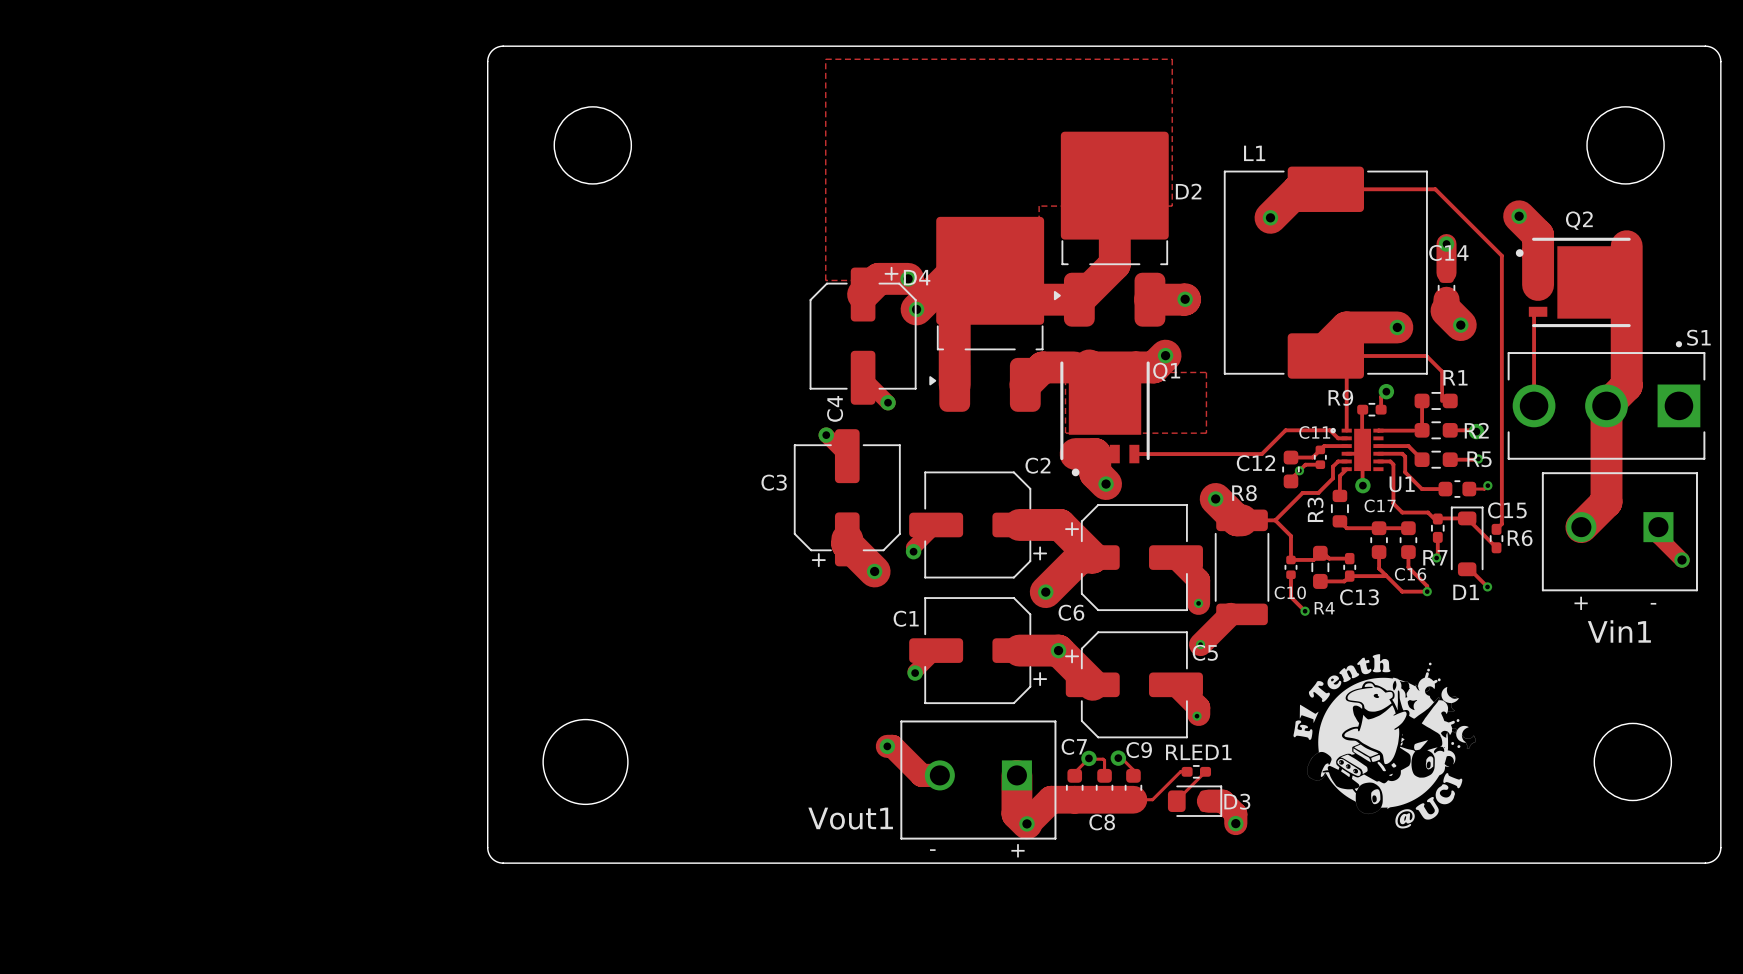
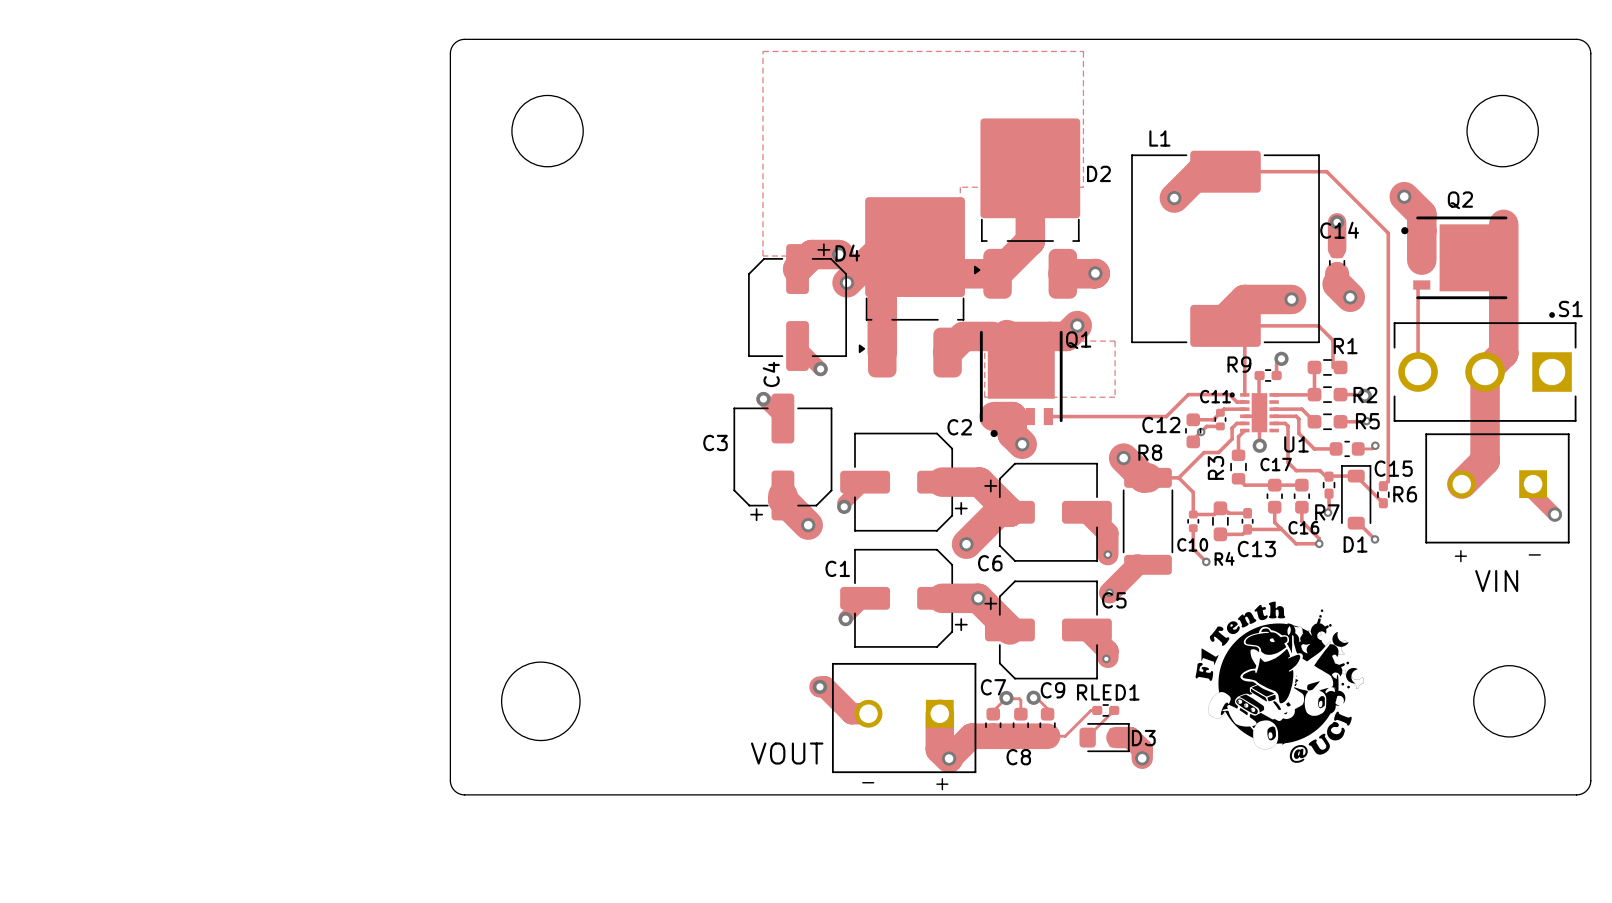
Vin1 name: Vin1 (1619, 631) -> VIN (1496, 581)
Vout1 name: Vout1 (850, 818) -> VOUT (787, 753)

